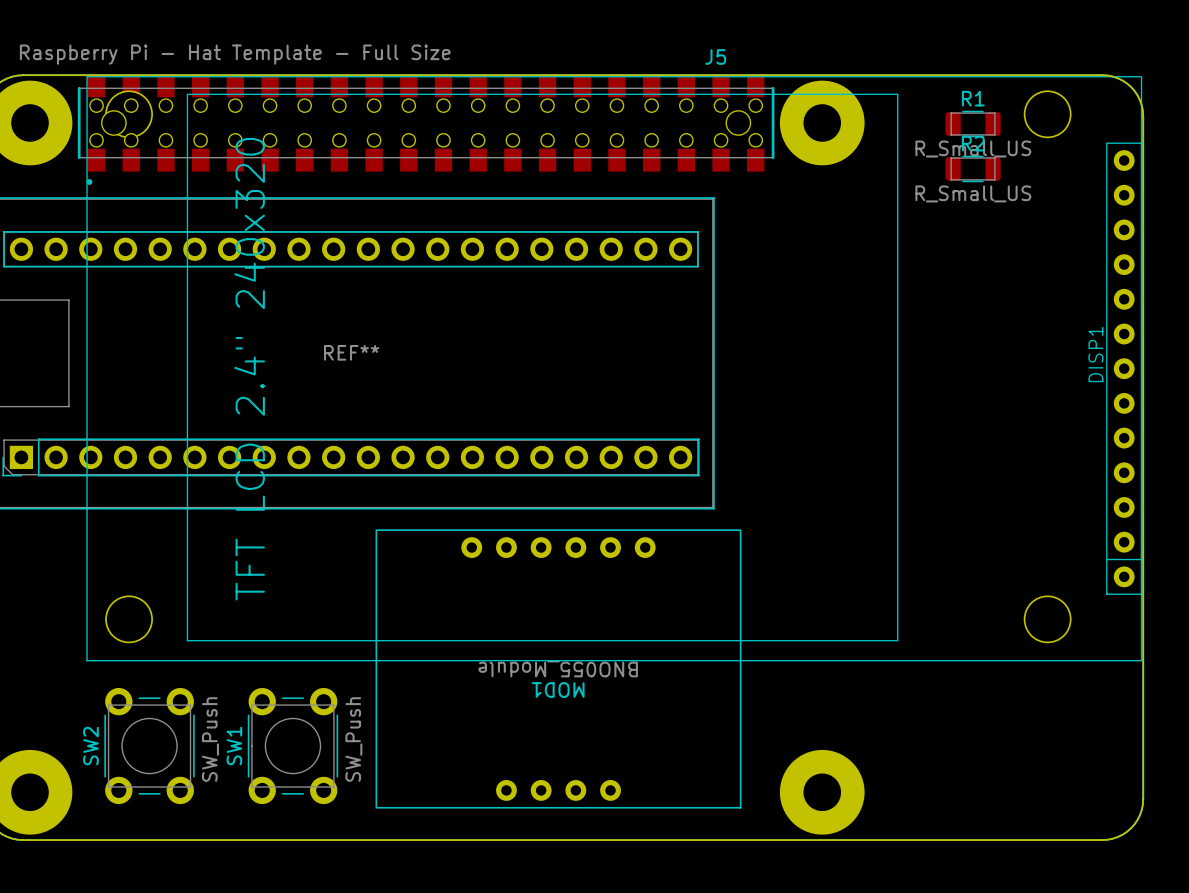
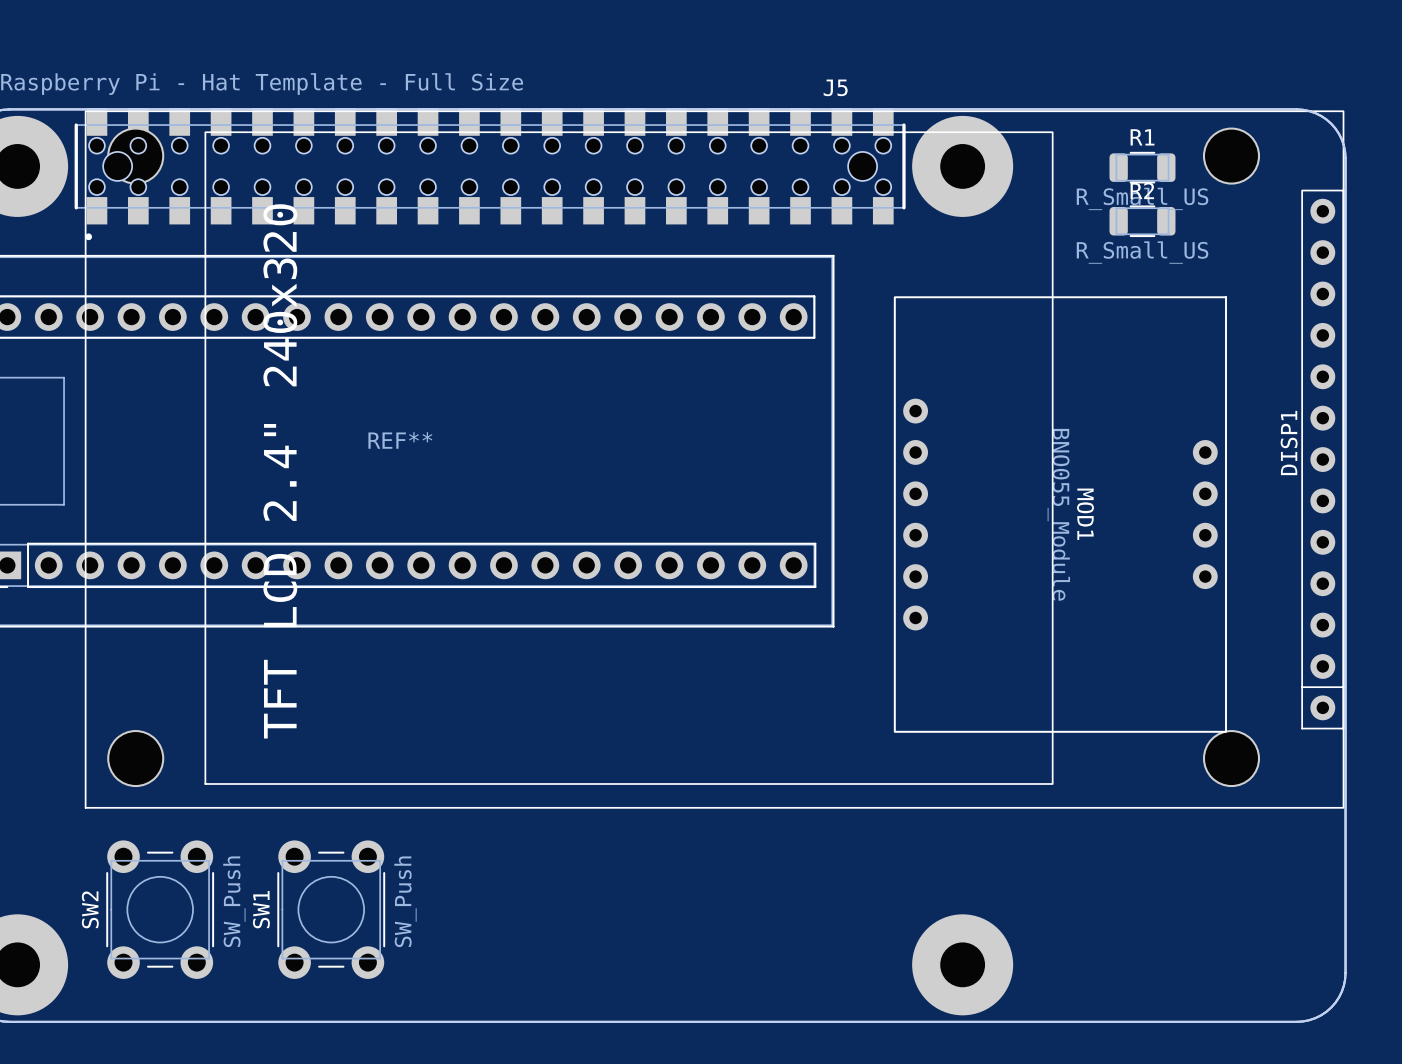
MOD1 rotation: 0° (558, 668) -> 90° counterclockwise (1060, 514)
MOD1 position: (558, 668) -> (1060, 514)

